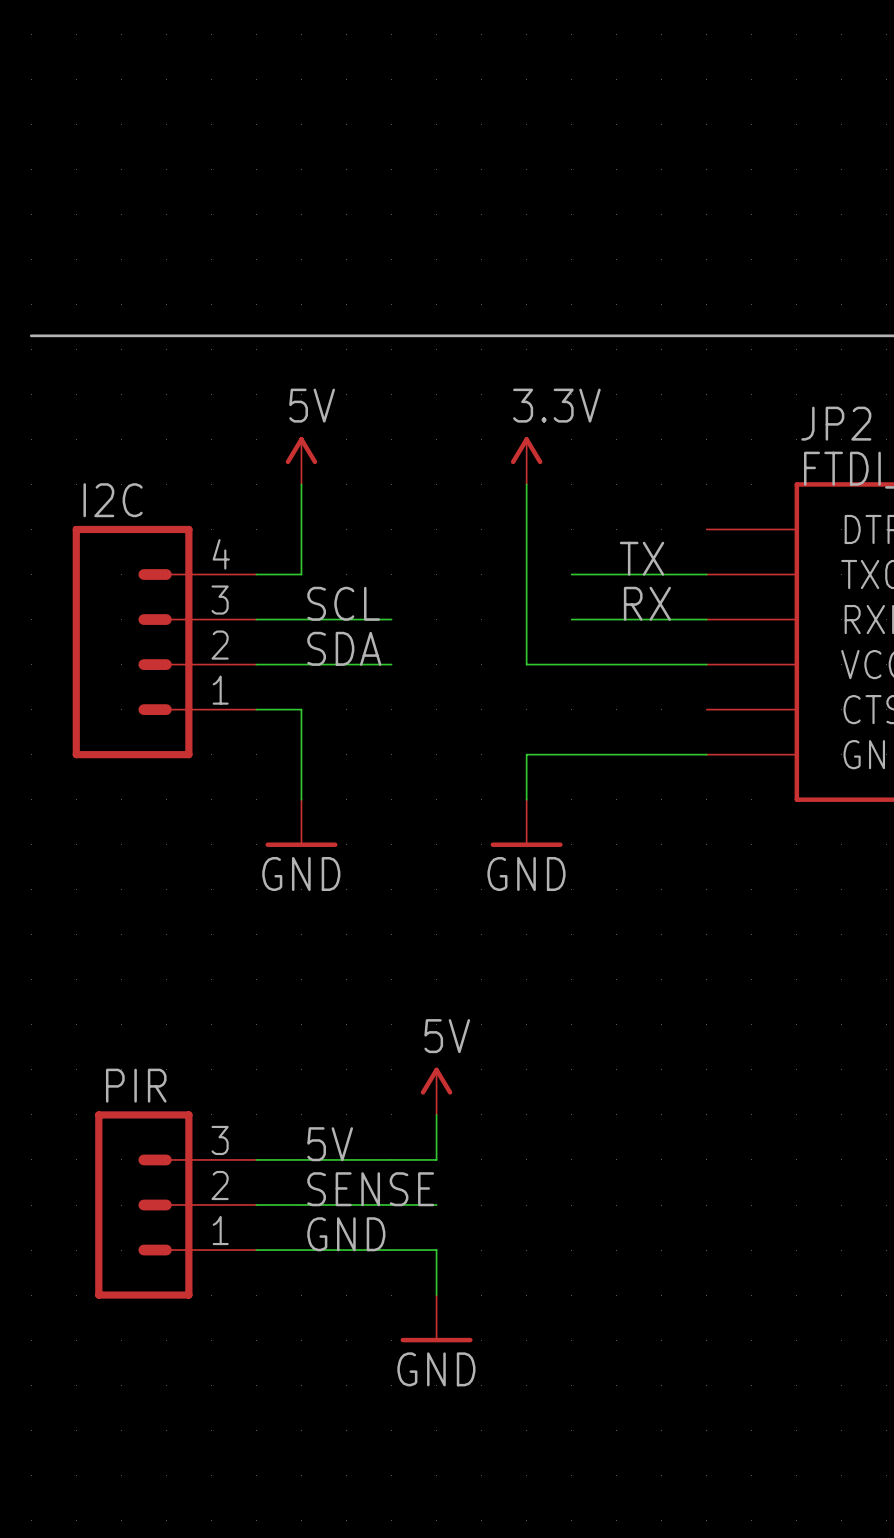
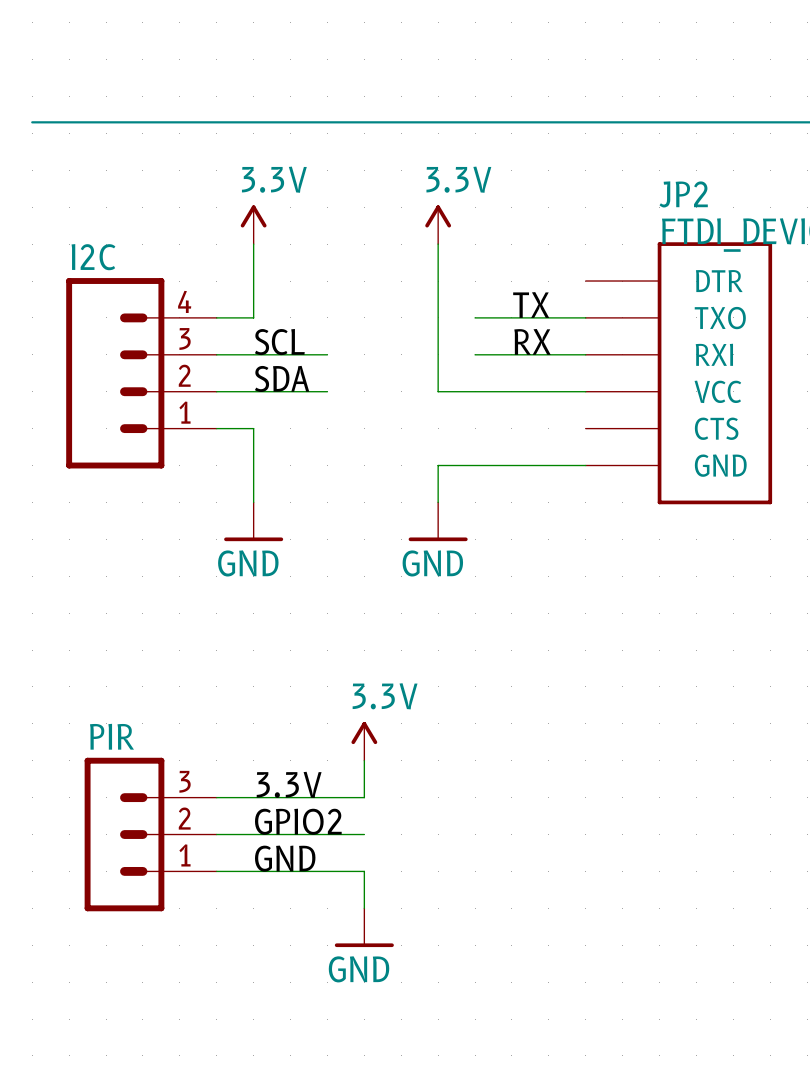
power symbol: 5V (301, 460) -> 3.3V (253, 224)
power symbol: 5V (436, 1091) -> 3.3V (364, 741)
label: 5V (330, 1144) -> 3.3V (289, 784)
label: SENSE (370, 1189) -> GPIO2 (298, 821)

